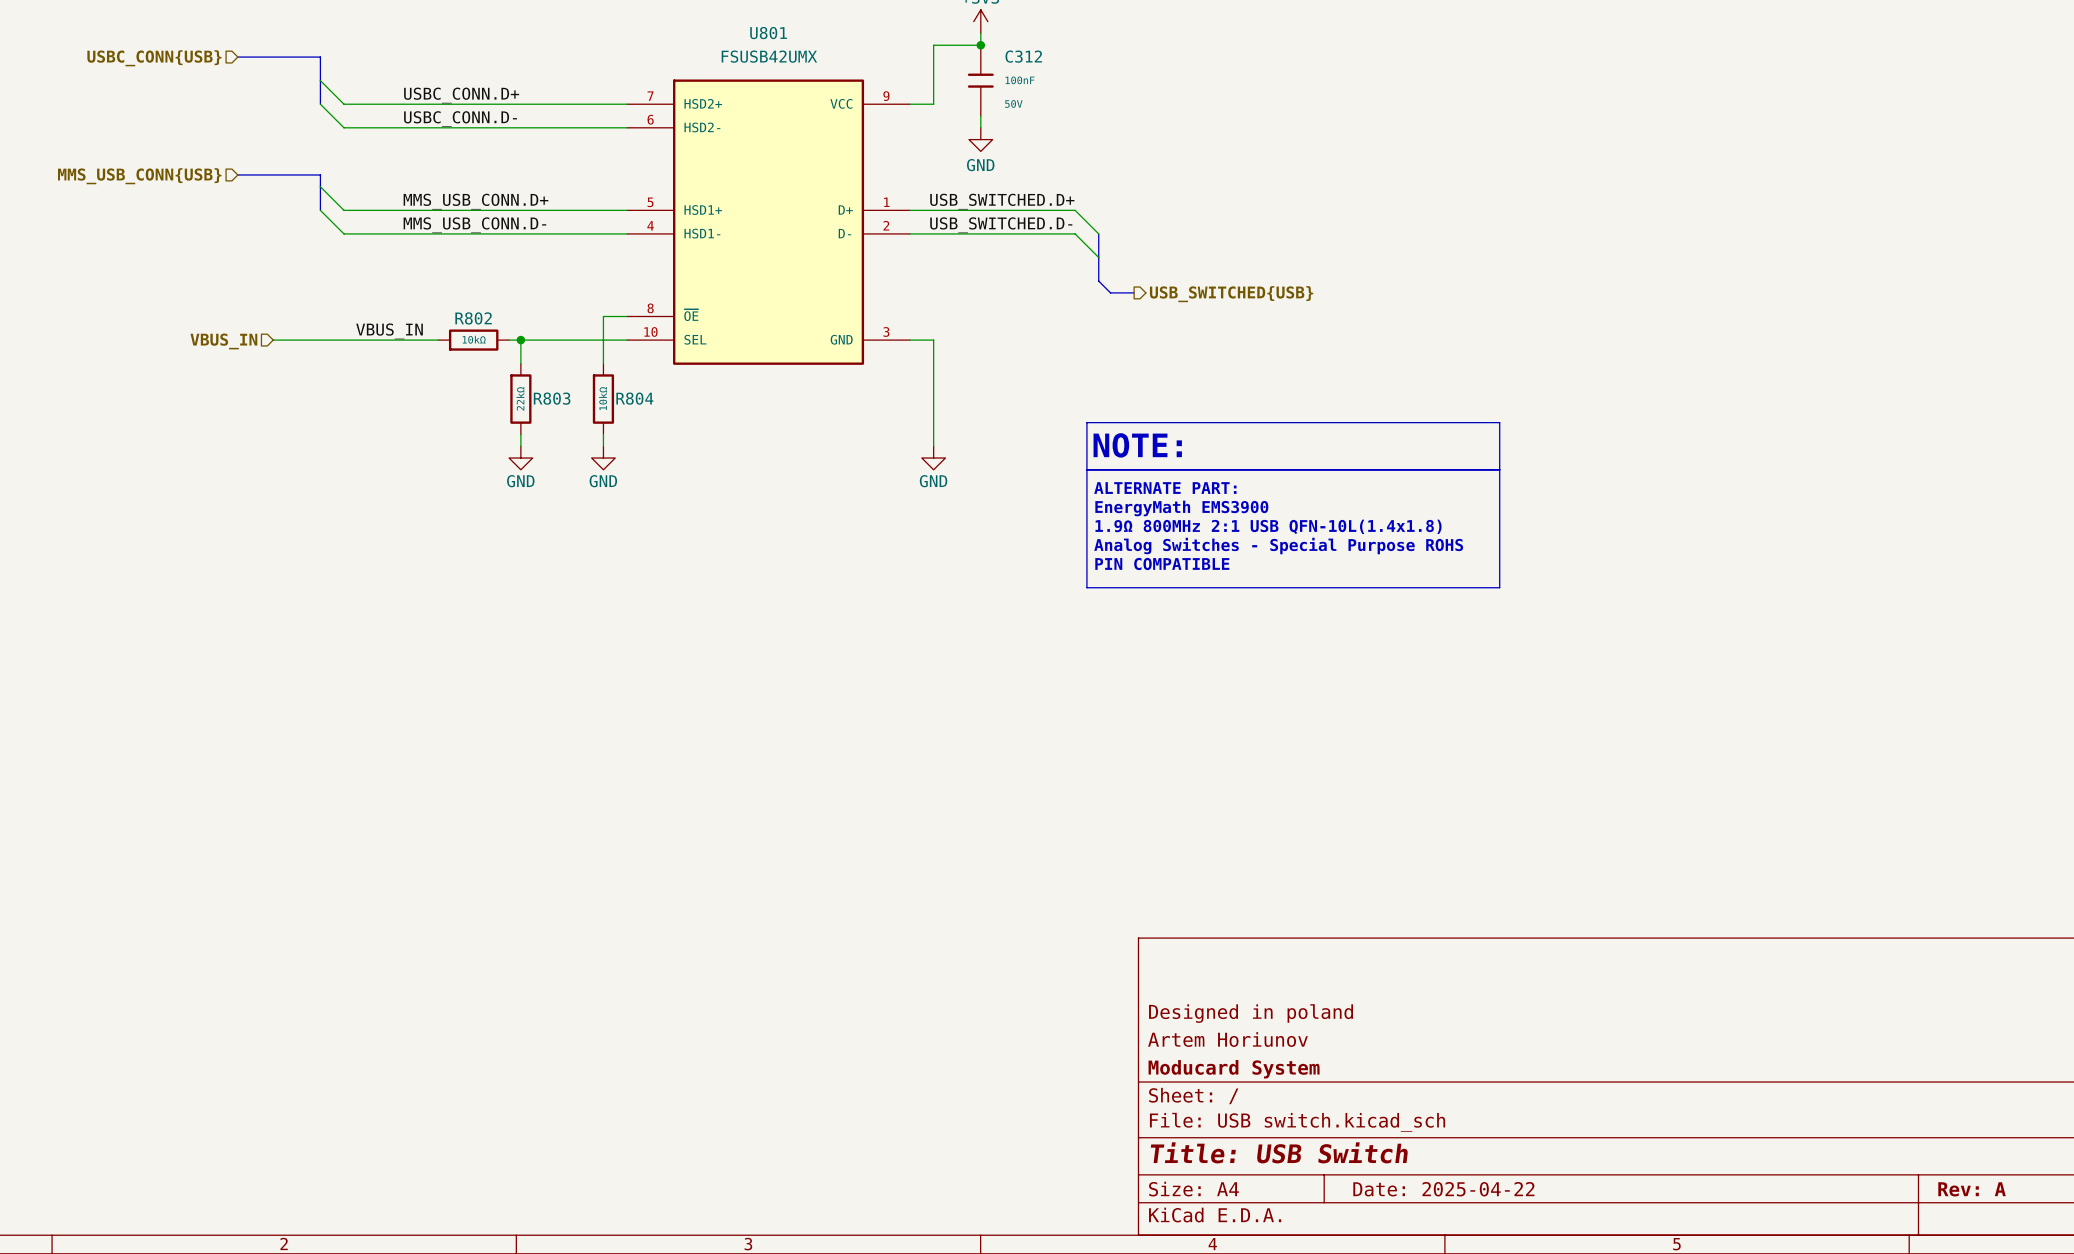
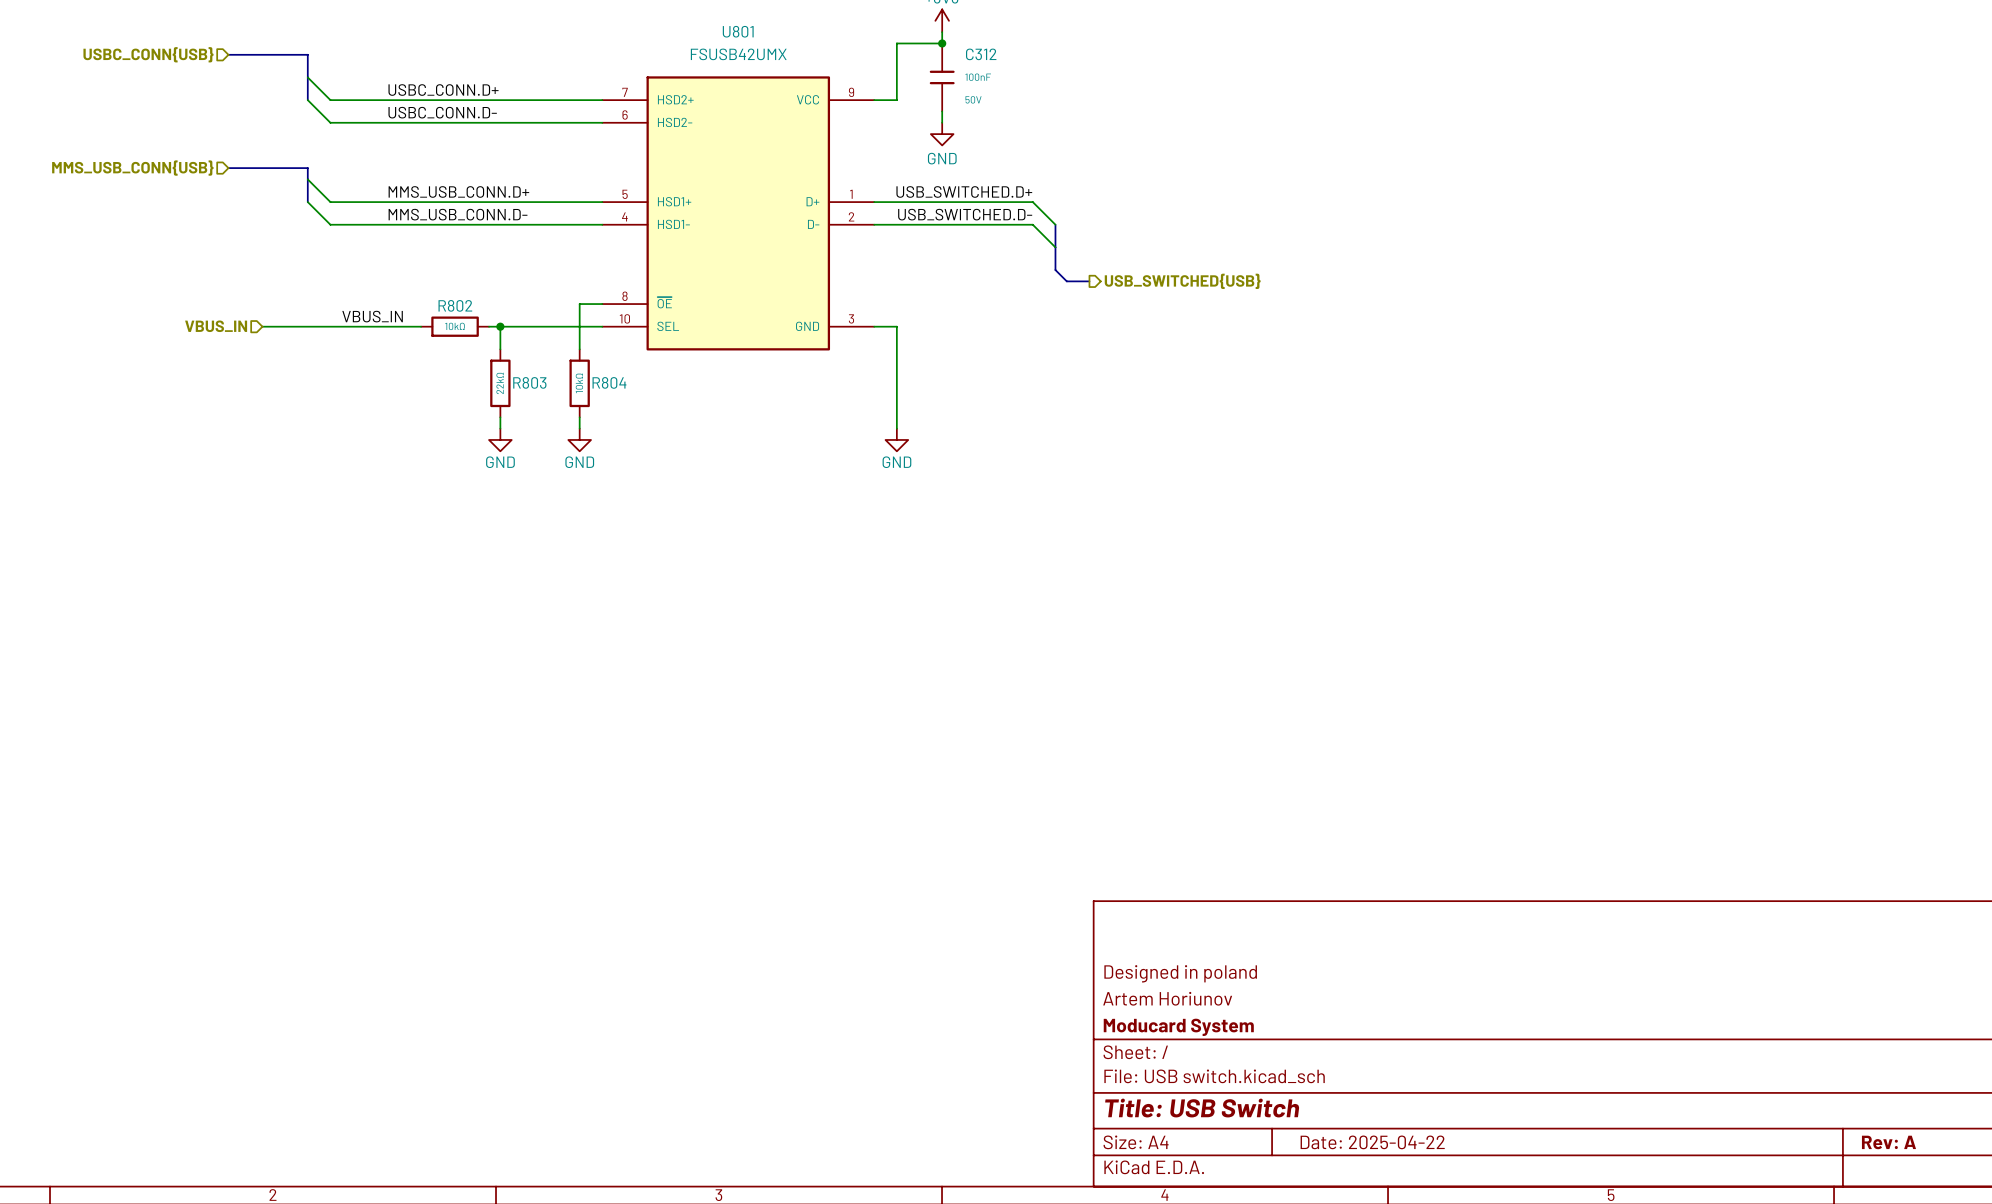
line: (1086, 422) (1499, 422) (1499, 587) (1086, 587) (1086, 422) -> none
text: NOTE: (1137, 445) -> none
line: (1086, 469) (1499, 469) -> none
text: ALTERNATE PART: (1165, 488) -> none
text: EnergyMath EMS3900 (1181, 508) -> none
text: 1.9Ω 800MHz 2:1 USB QFN-10L(1.4x1.8) (1268, 526) -> none
text: Analog Switches - Special Purpose ROHS (1278, 545) -> none
text: PIN COMPATIBLE (1162, 563) -> none

